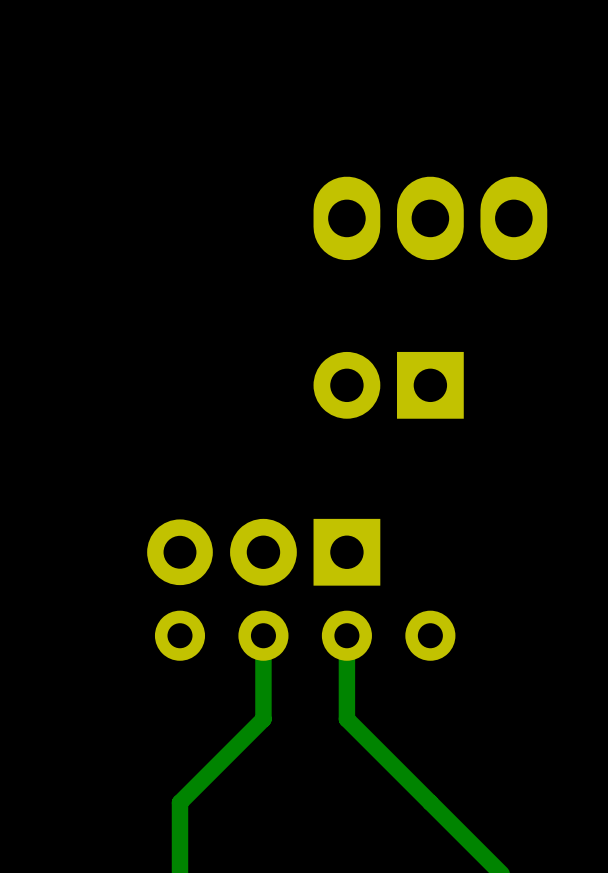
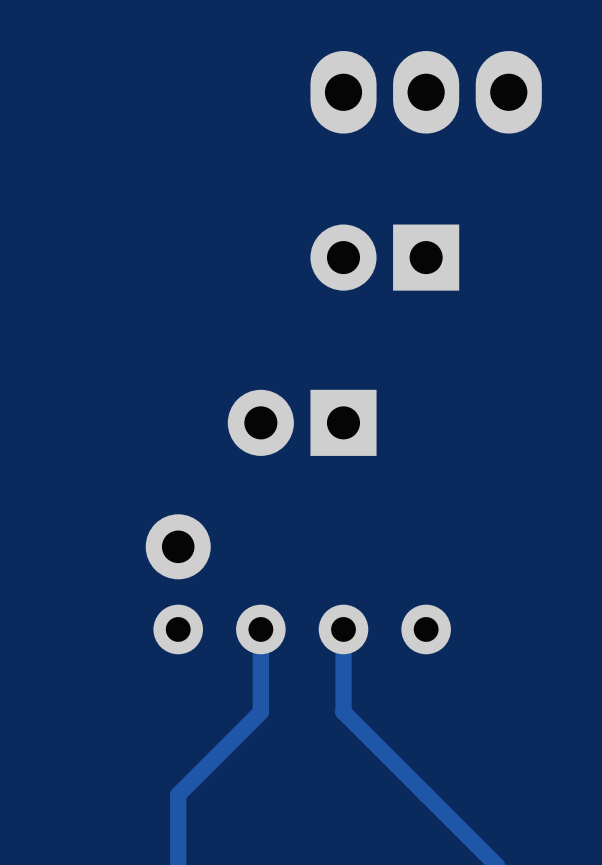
part position: (430, 218) -> (426, 92)
part: none -> (384, 257)
part: (388, 385) -> none
part: none -> (302, 422)
part: (305, 552) -> none

